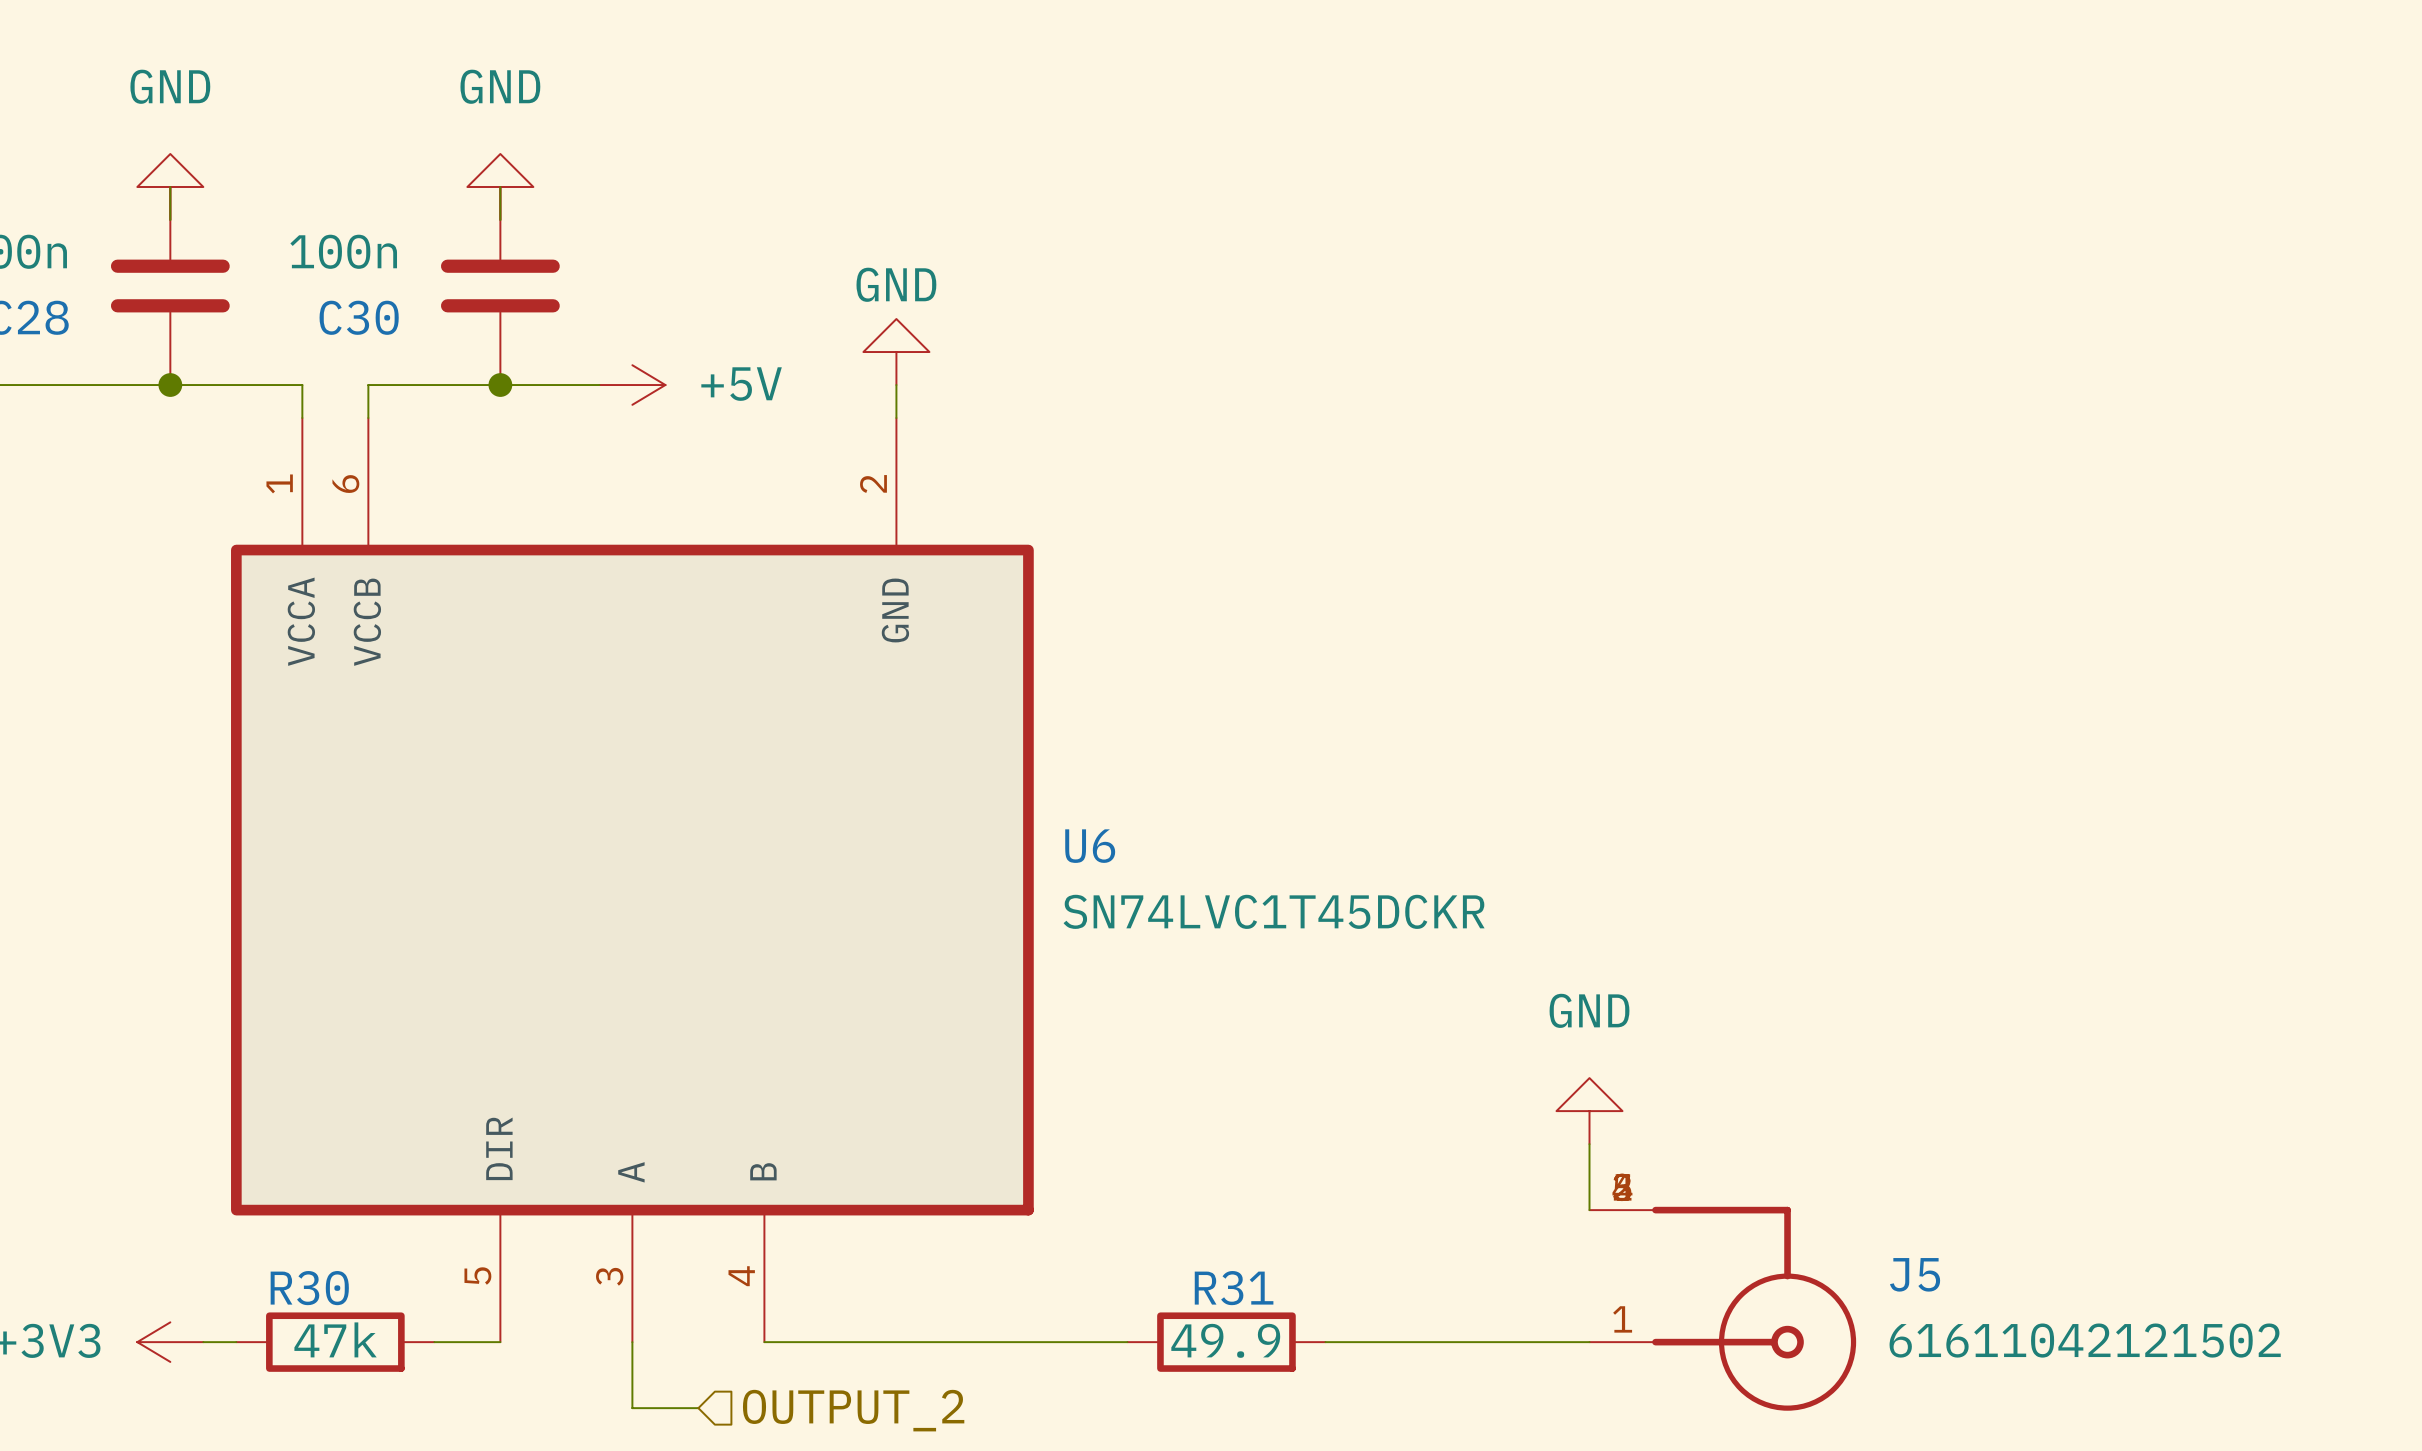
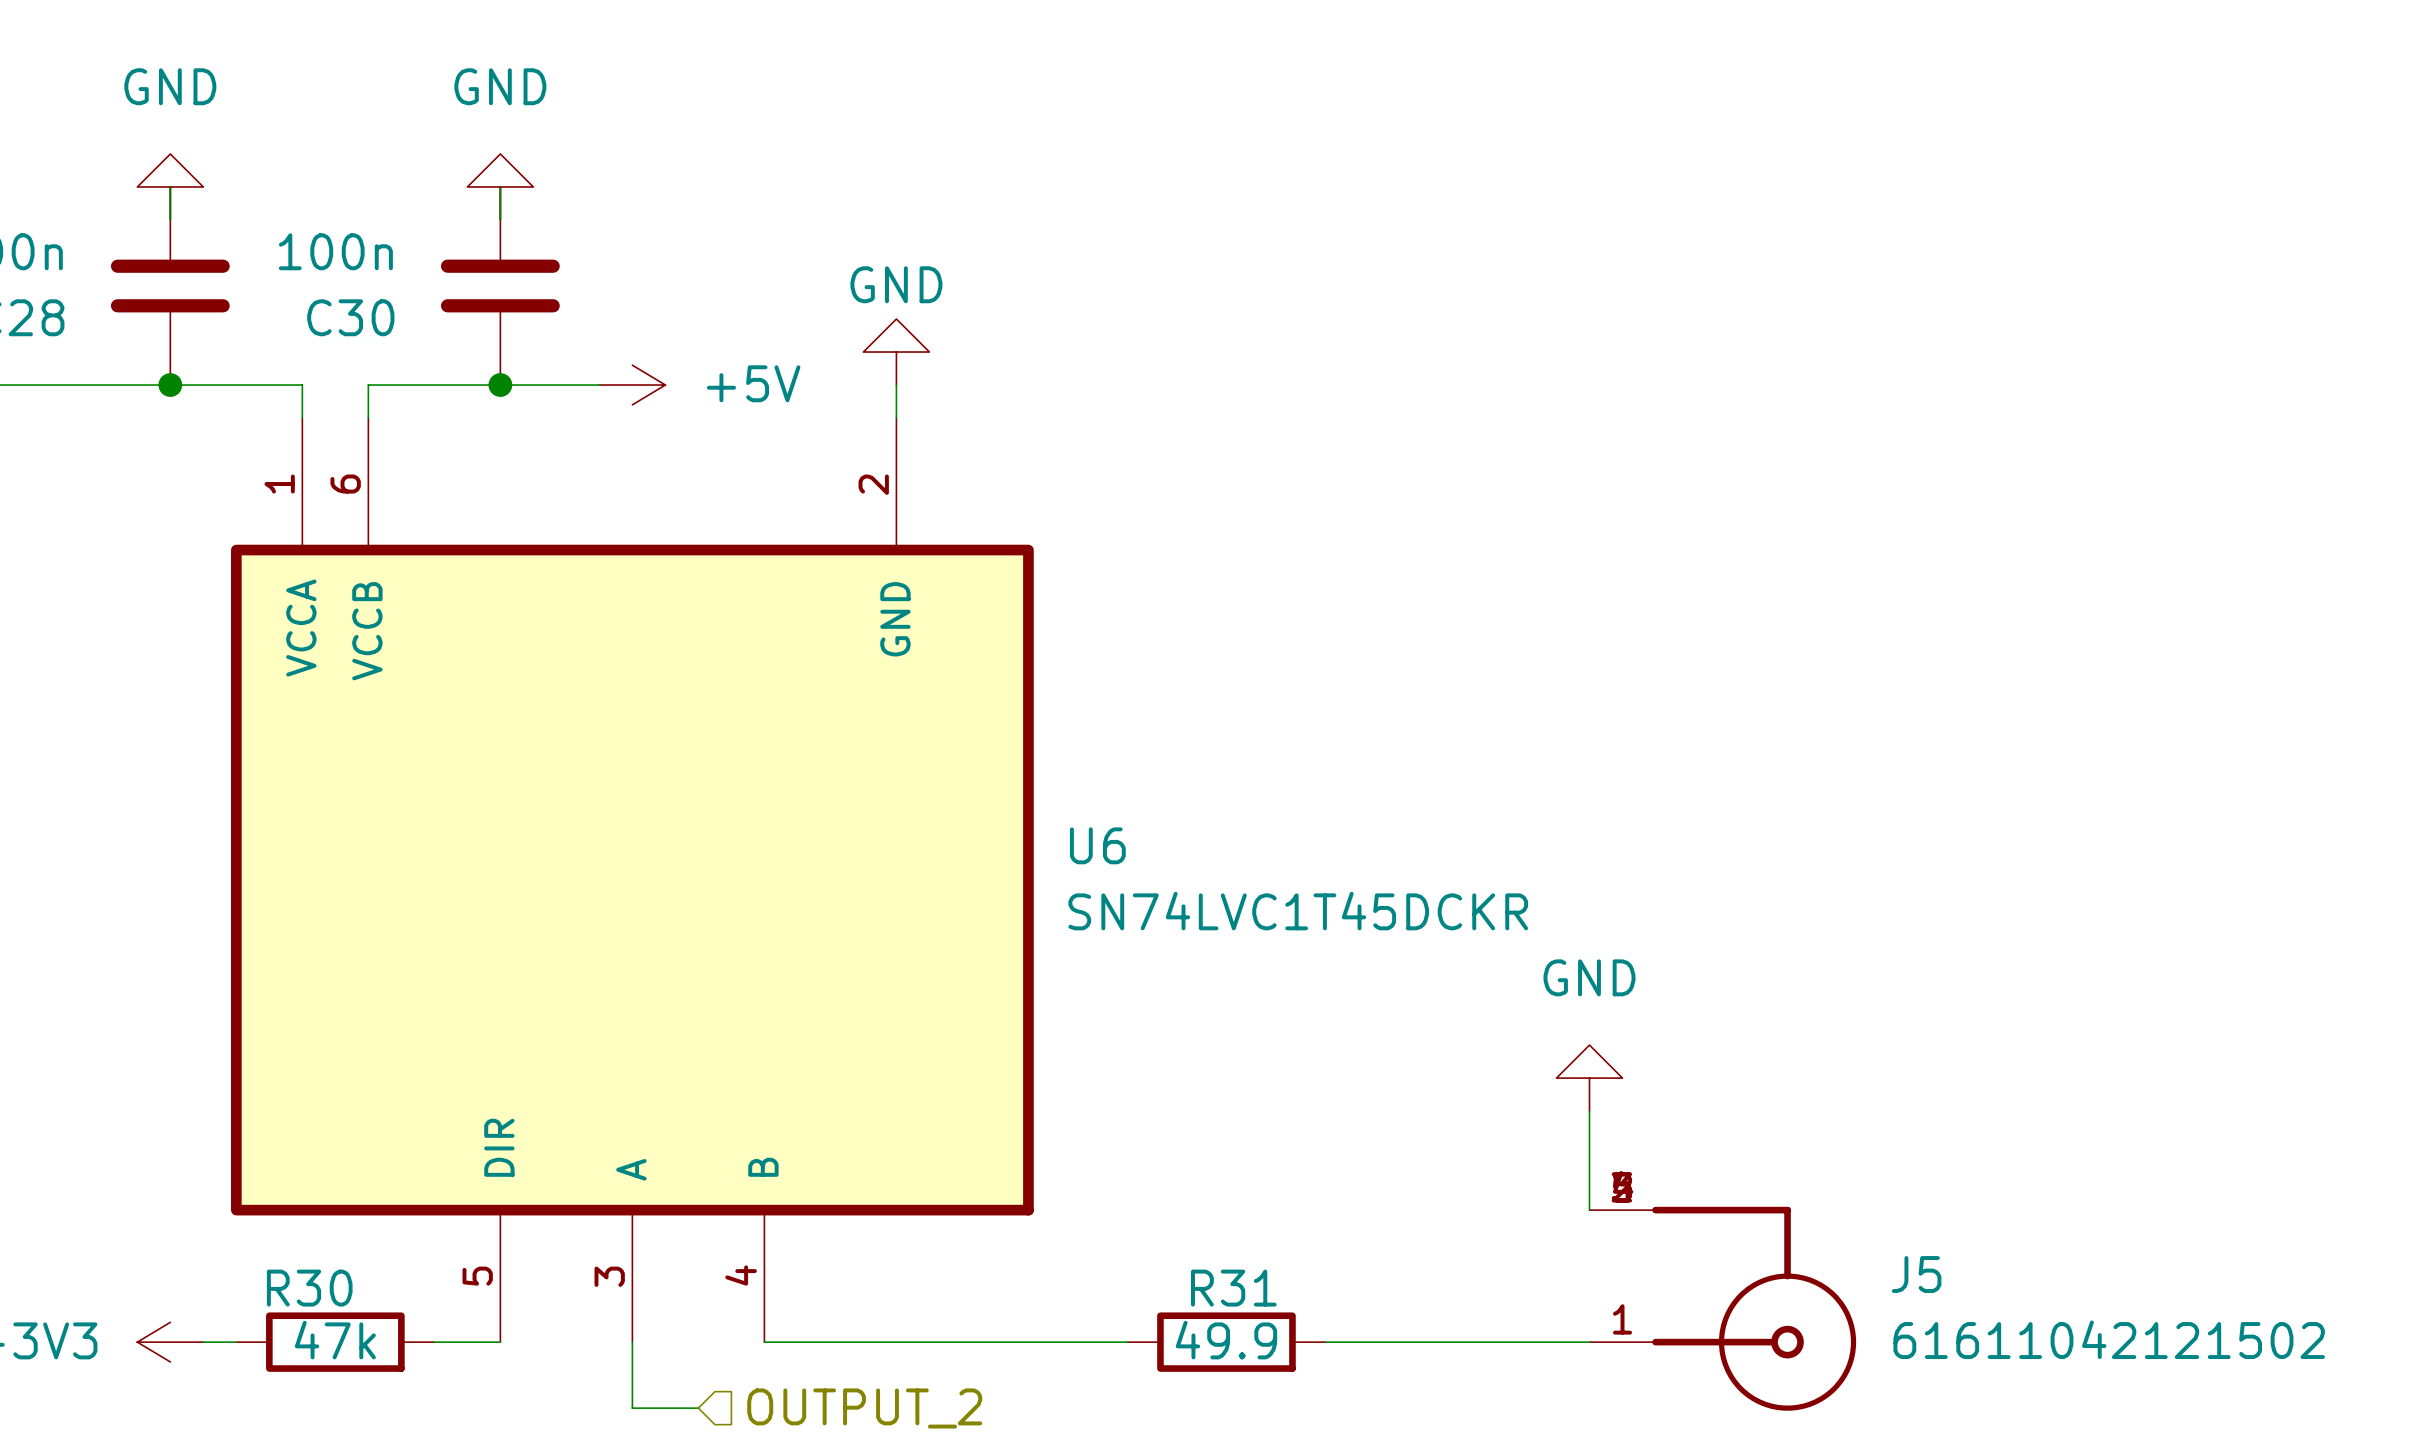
power symbol position: GND (1589, 1111) -> GND (1589, 1078)

